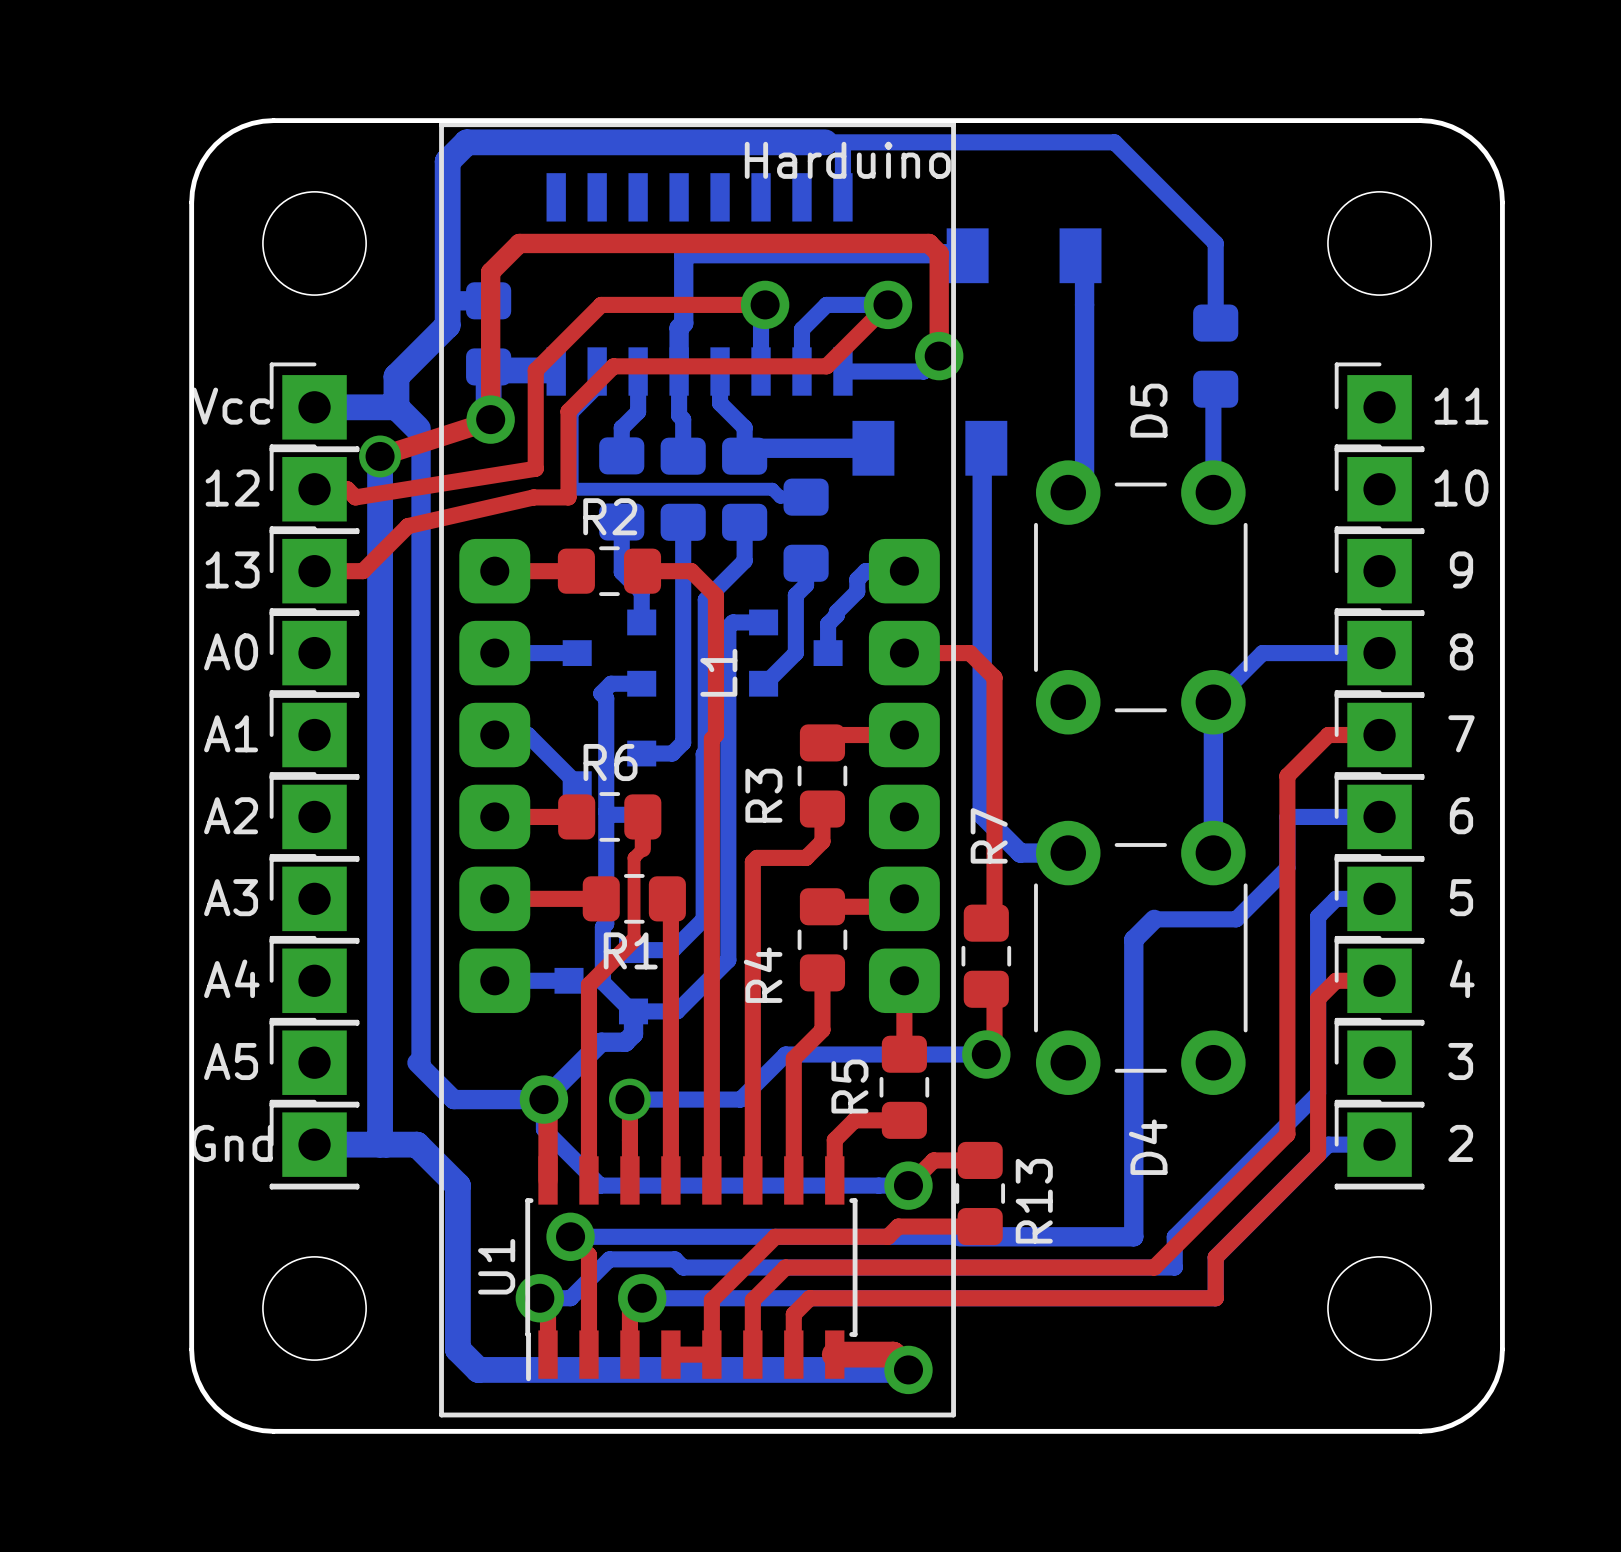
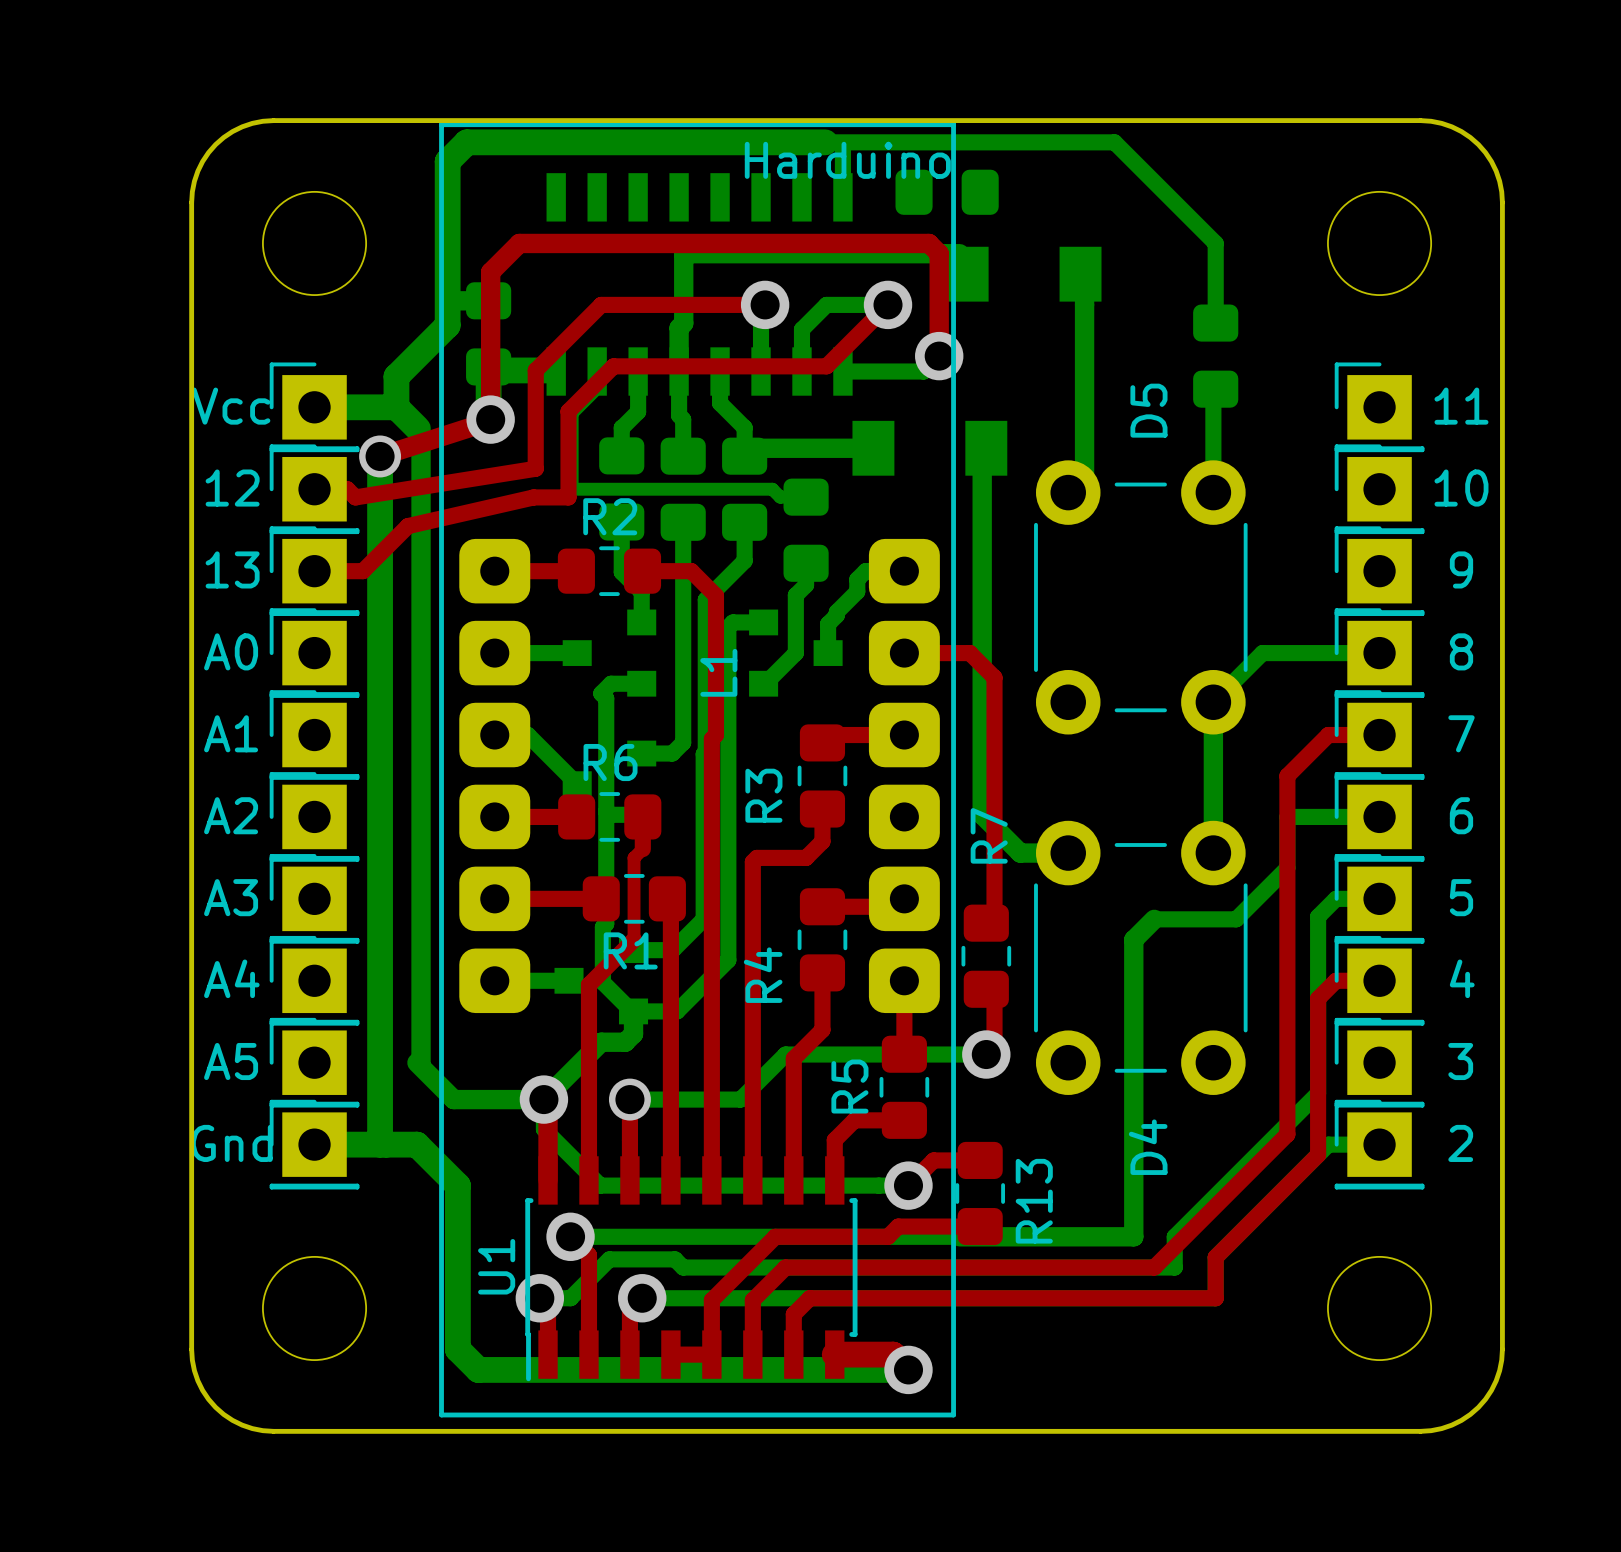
part: none -> (947, 192)
part position: (1024, 255) -> (1024, 274)

